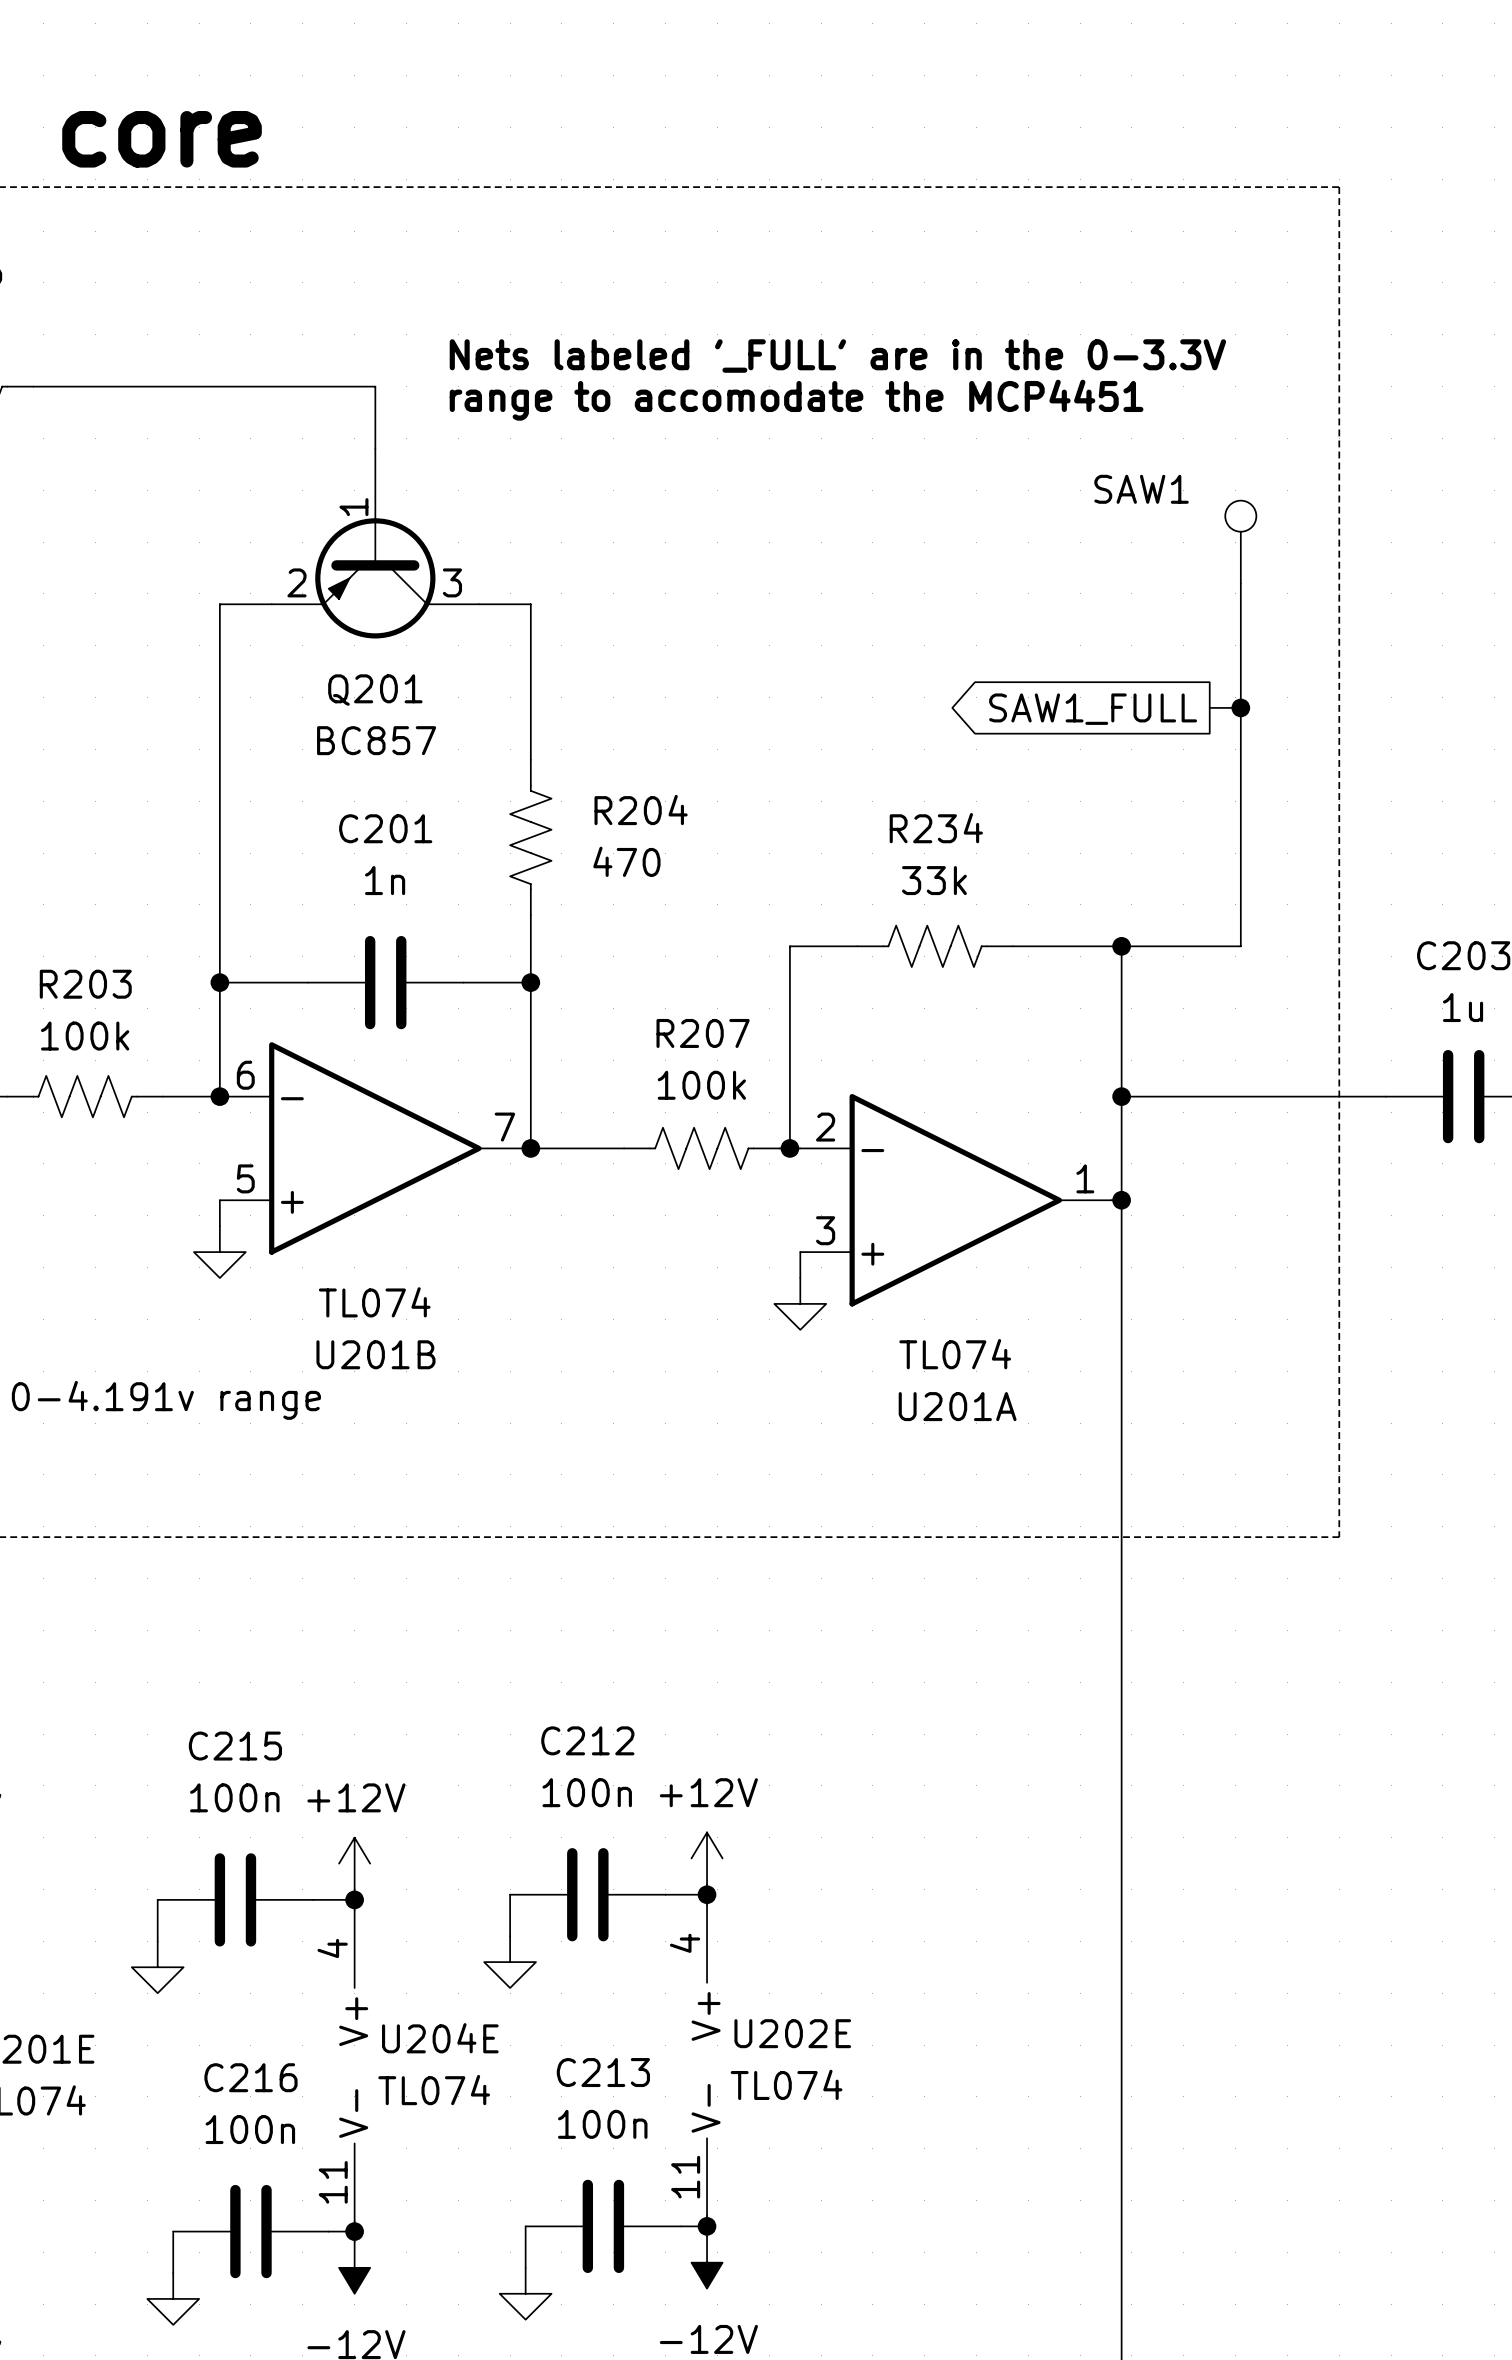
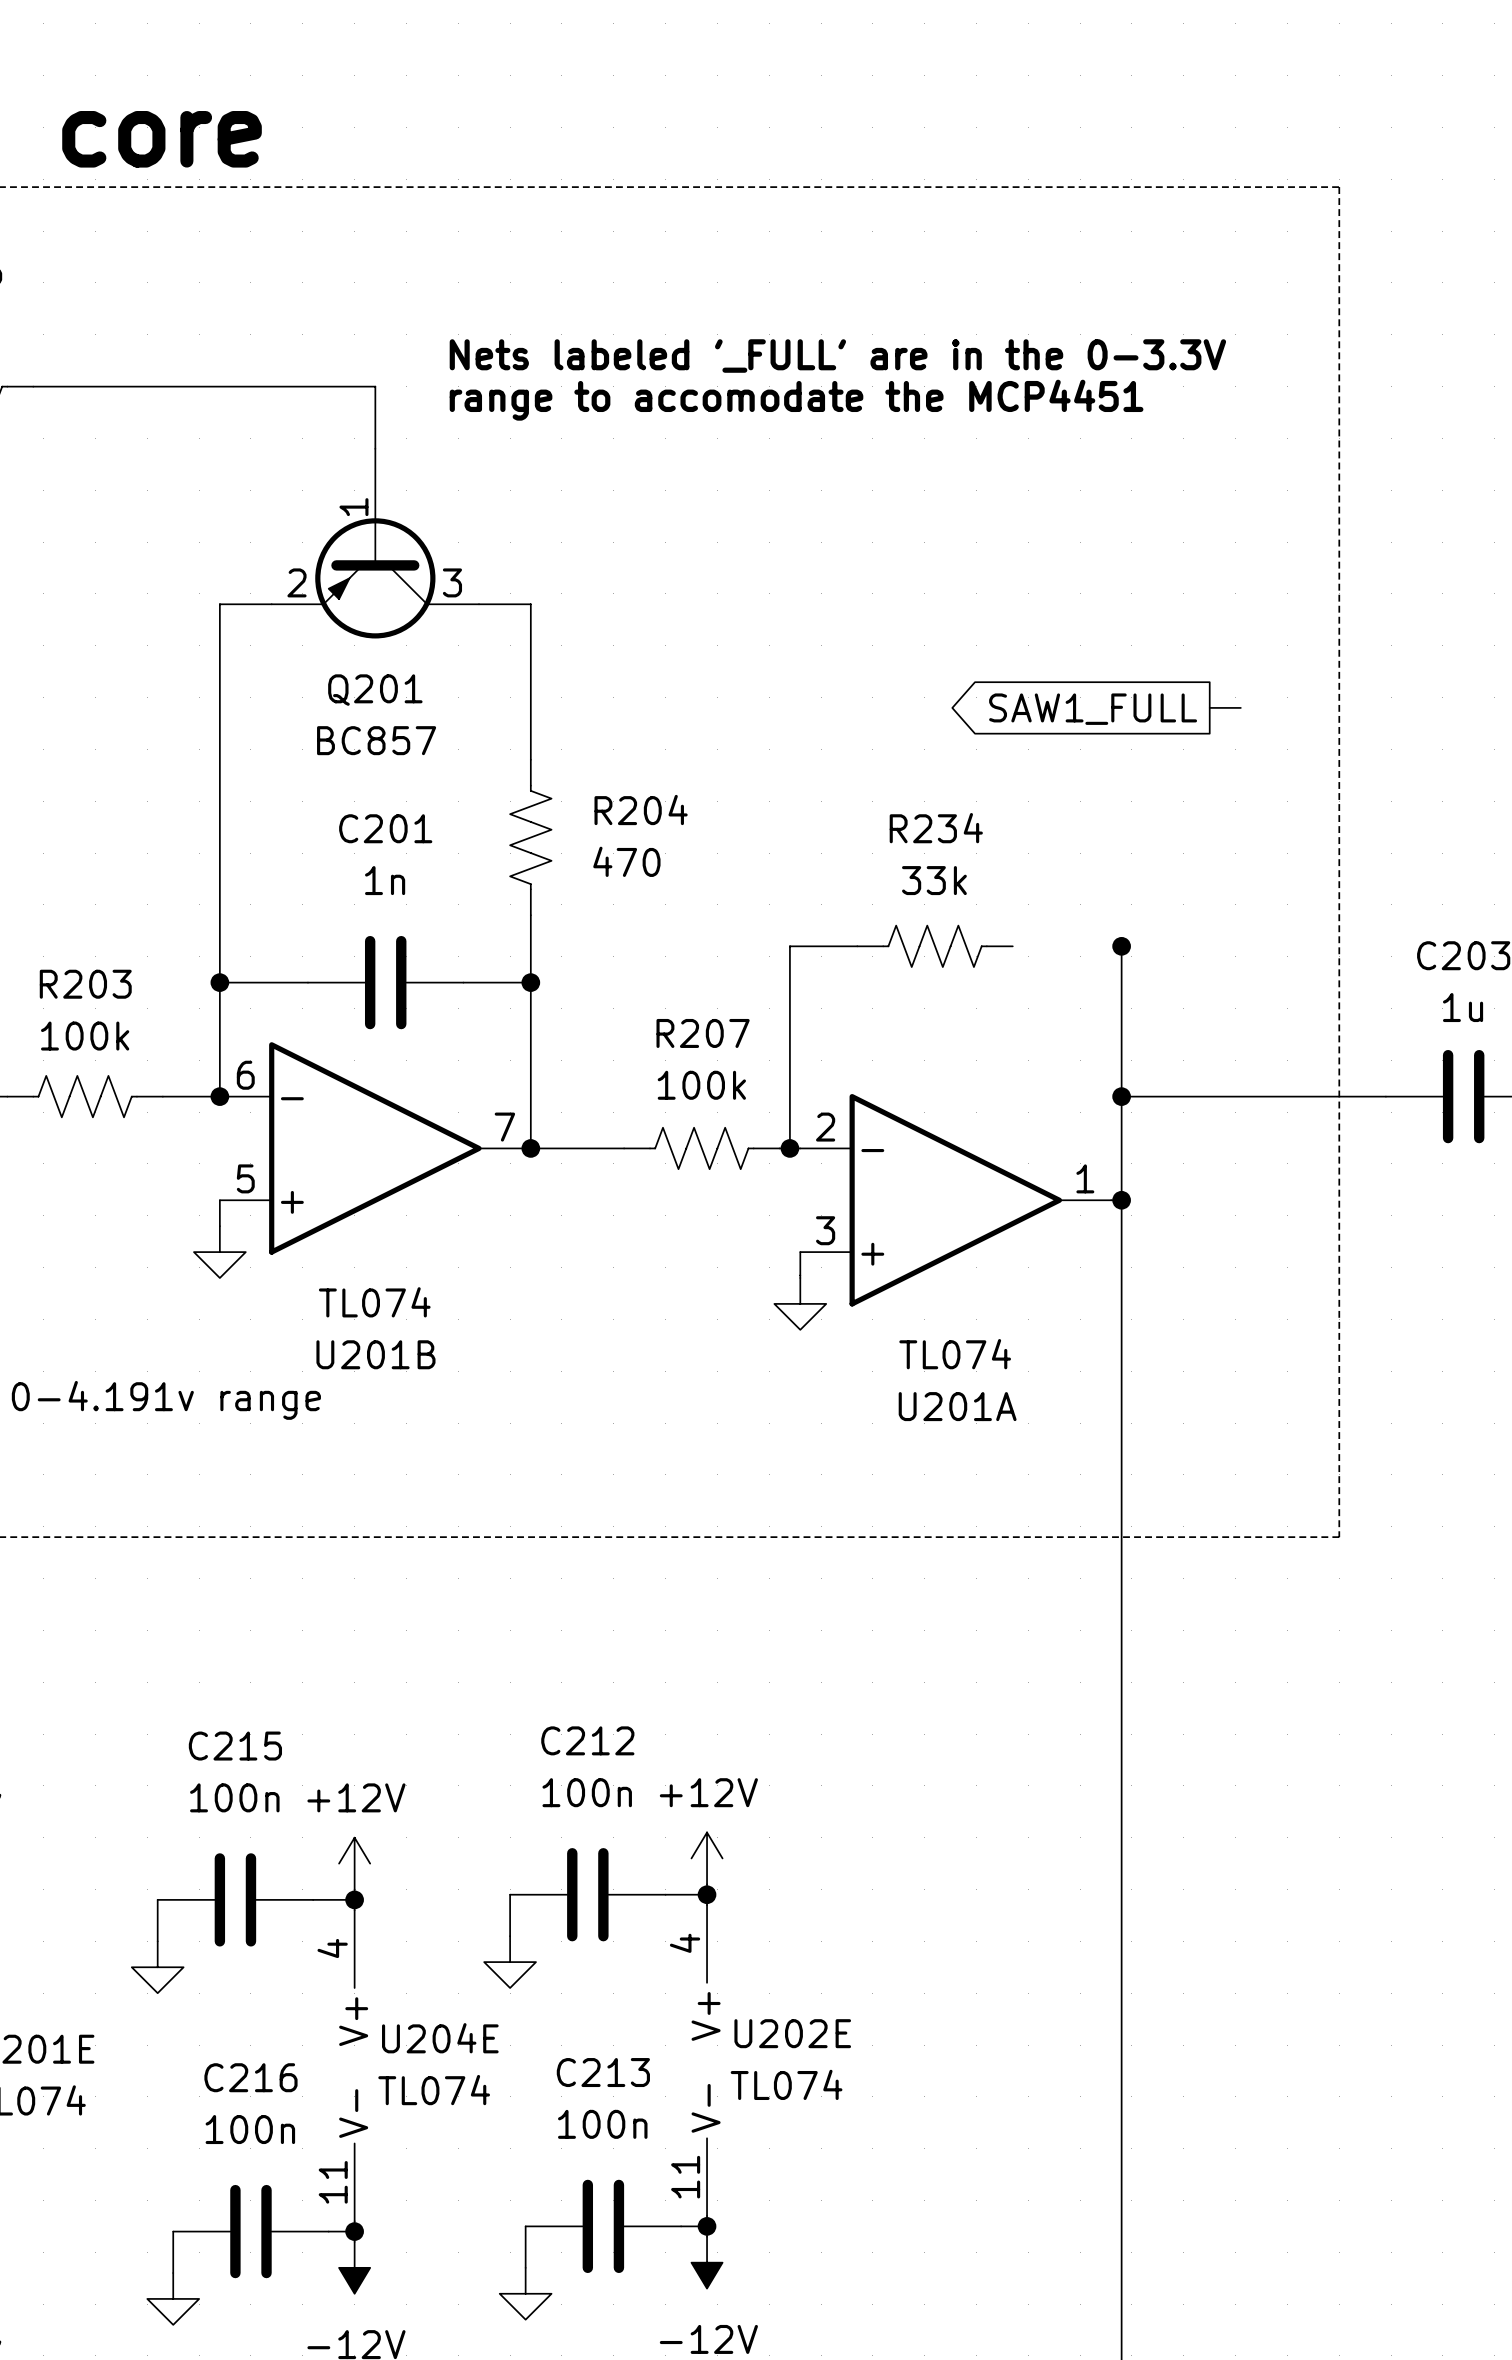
SAW1: (1240, 542) -> none
wire: (1240, 583) (1240, 946) (1012, 946) -> none
junction: (1240, 707) -> none

